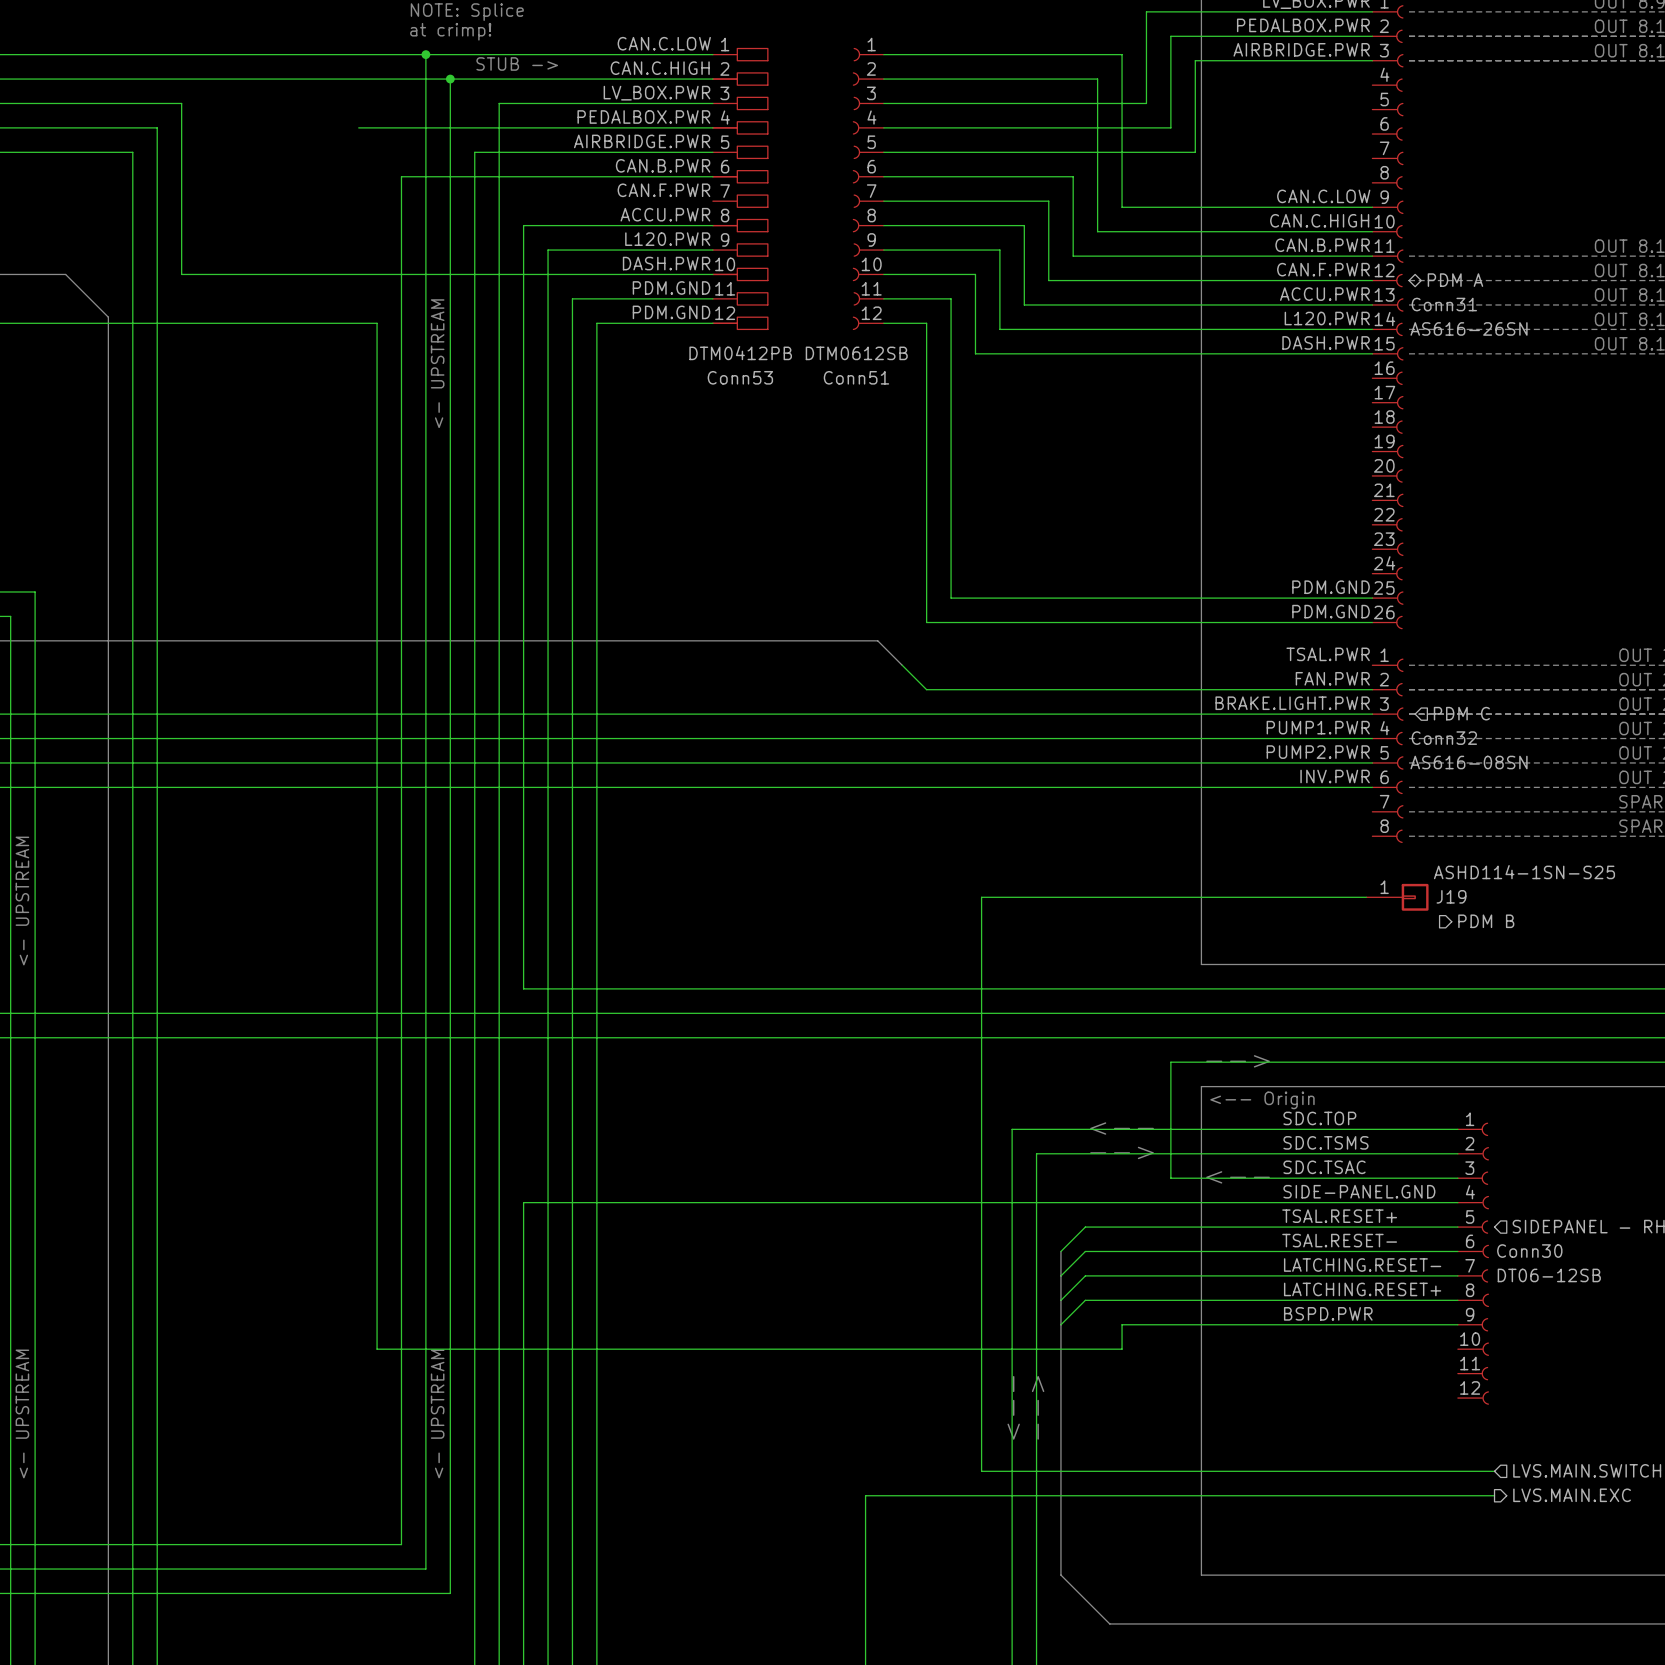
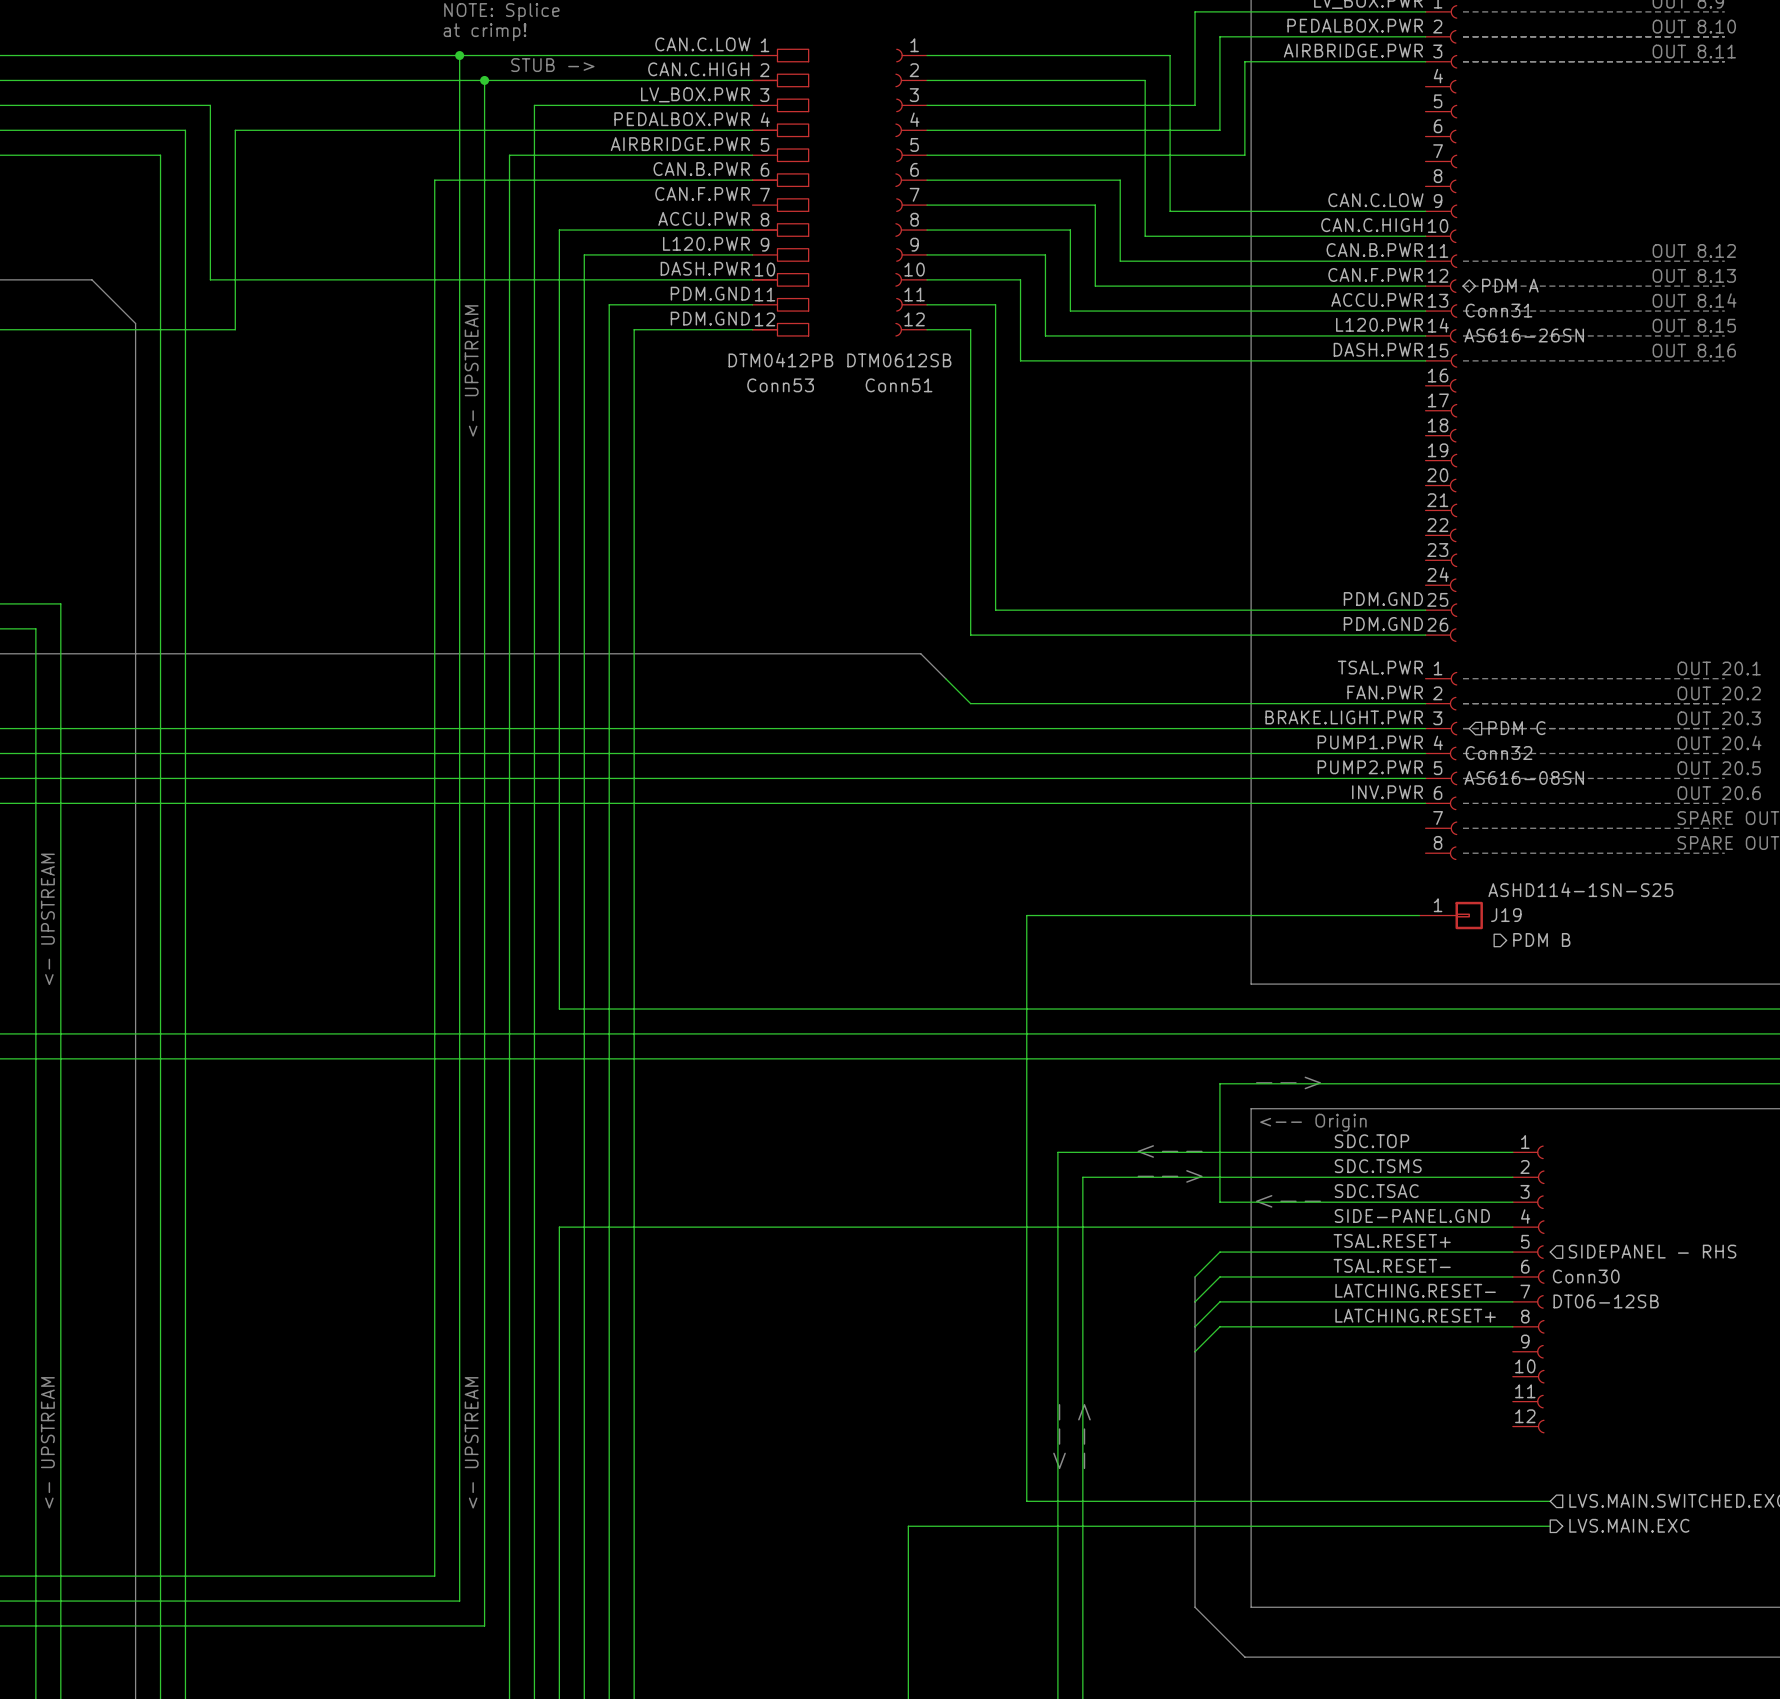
wire: (206, 323) (377, 323) (377, 1349) (1122, 1349) (1122, 1324) (1457, 1324) -> (235, 329) (235, 130) (391, 130)
wire: (1170, 1227) (1085, 1227) (1060, 1251) -> (1219, 1252) (1195, 1276)
bus: (1060, 1251) (1060, 1575) (1109, 1623) (1195, 1623) -> (1195, 1276) (1195, 1607) (1244, 1657)
wire: (1170, 1251) (1085, 1251) (1060, 1275) -> (1219, 1276) (1195, 1301)
wire: (1170, 1275) (1085, 1275) (1060, 1300) -> (1219, 1301) (1195, 1326)
wire: (1170, 1300) (1085, 1300) (1060, 1324) -> (1219, 1326) (1195, 1351)
label: BSPD.PWR (1328, 1313) -> none

